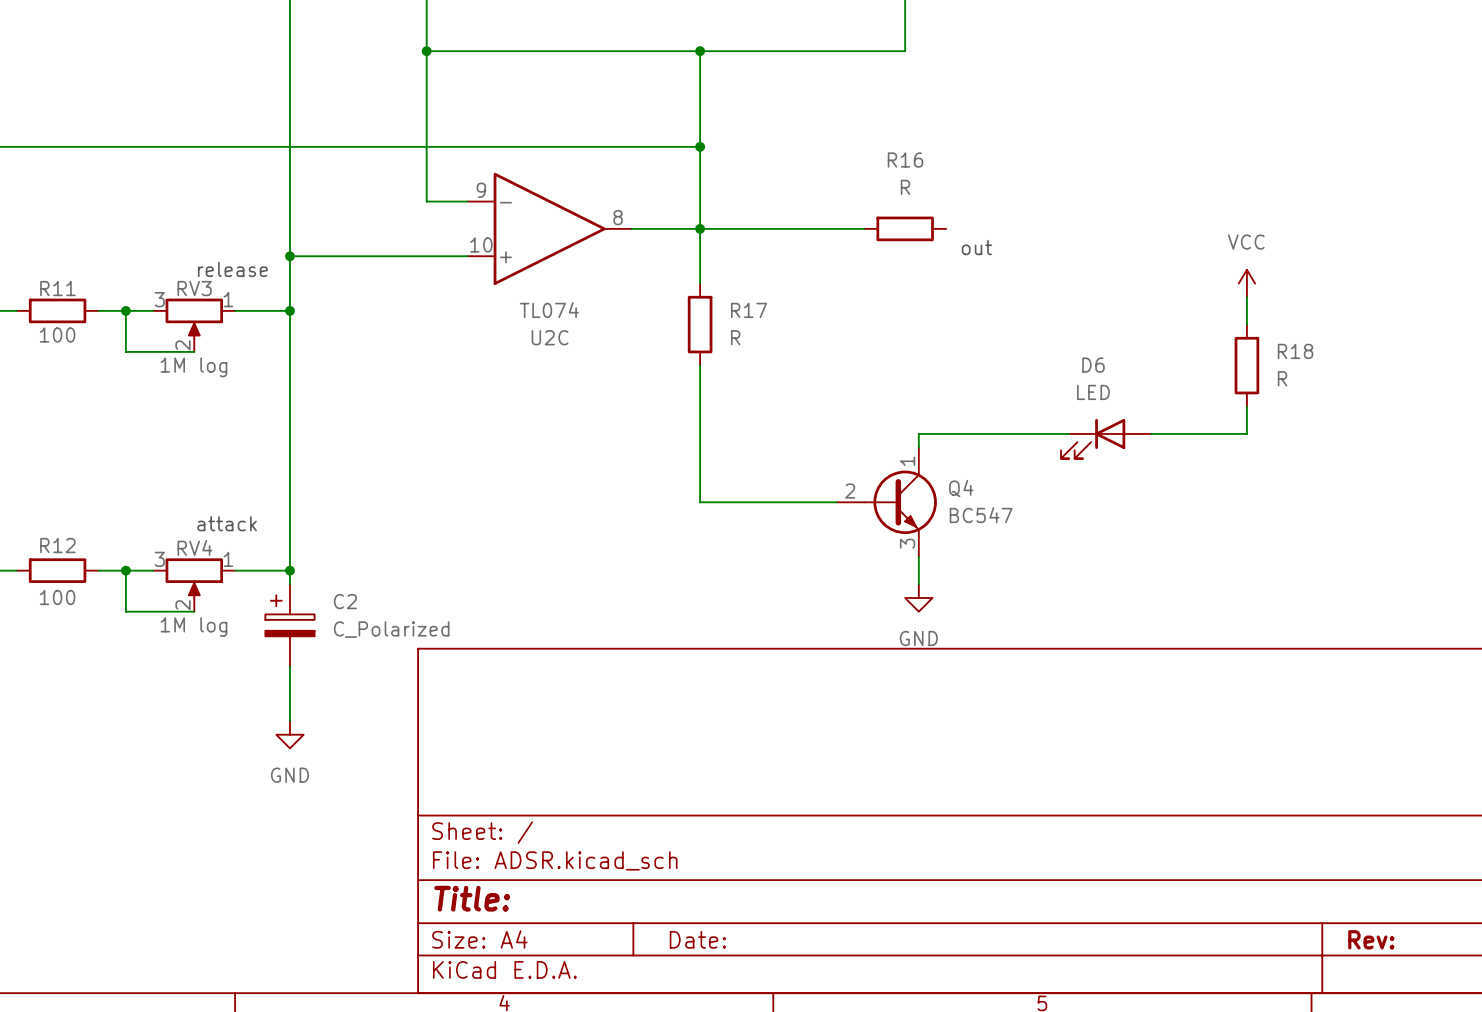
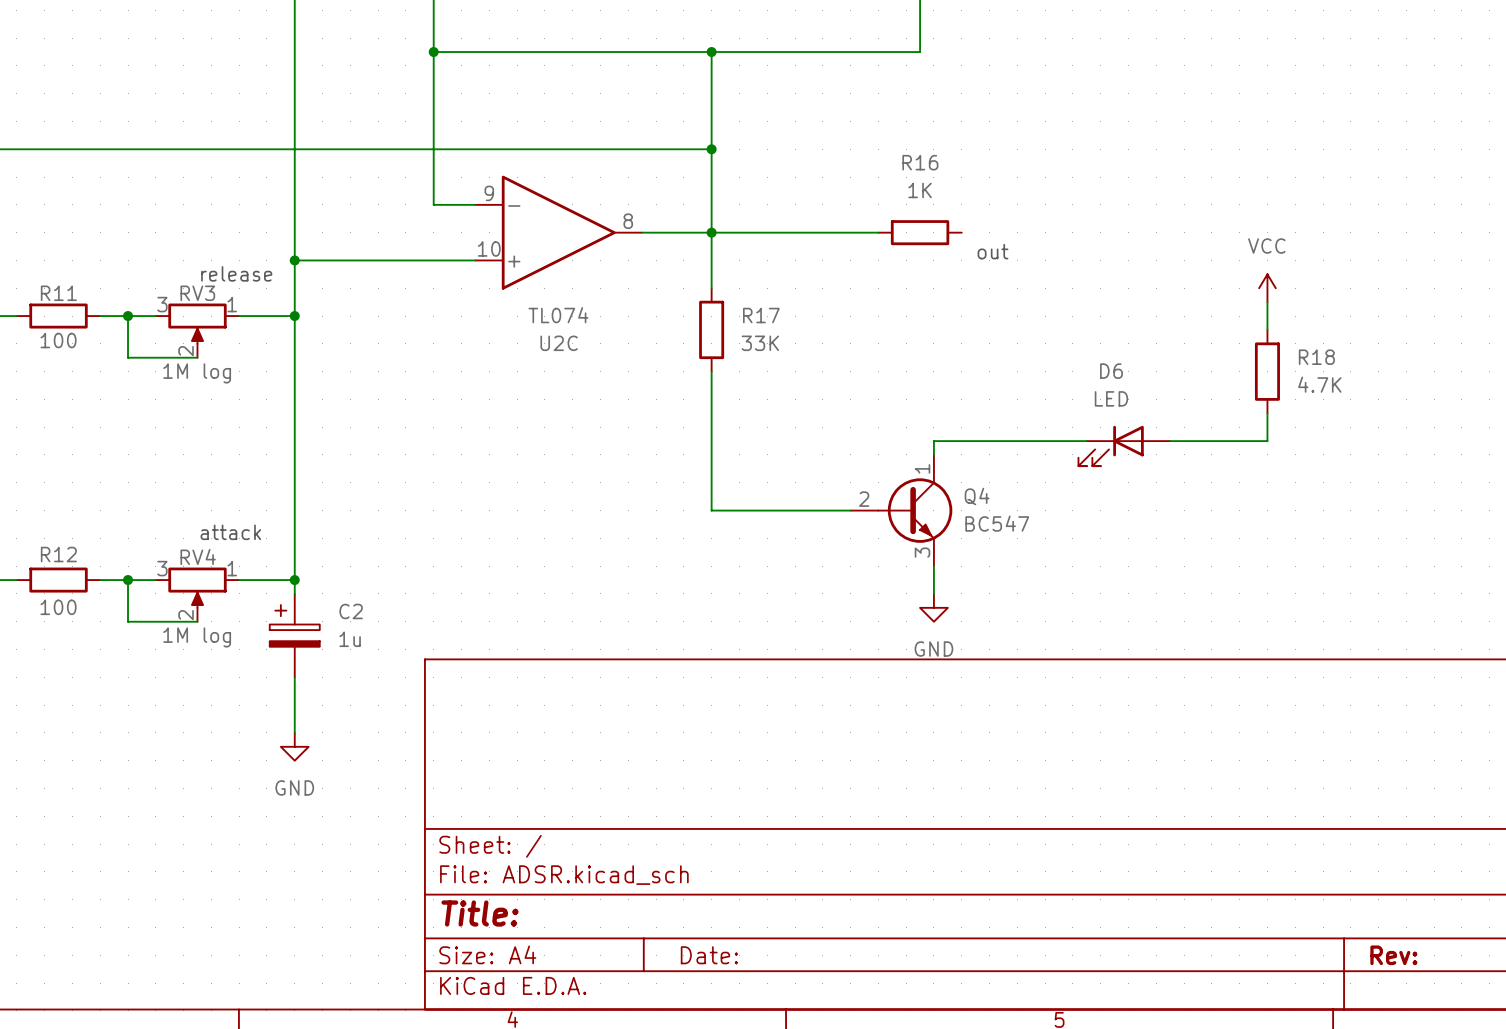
R16 value: R (905, 187) -> 1K (920, 190)
R17 value: R (735, 337) -> 33K (760, 343)
R18 value: R (1282, 378) -> 4.7K (1319, 384)
C2 value: C_Polarized (391, 629) -> 1u (350, 639)

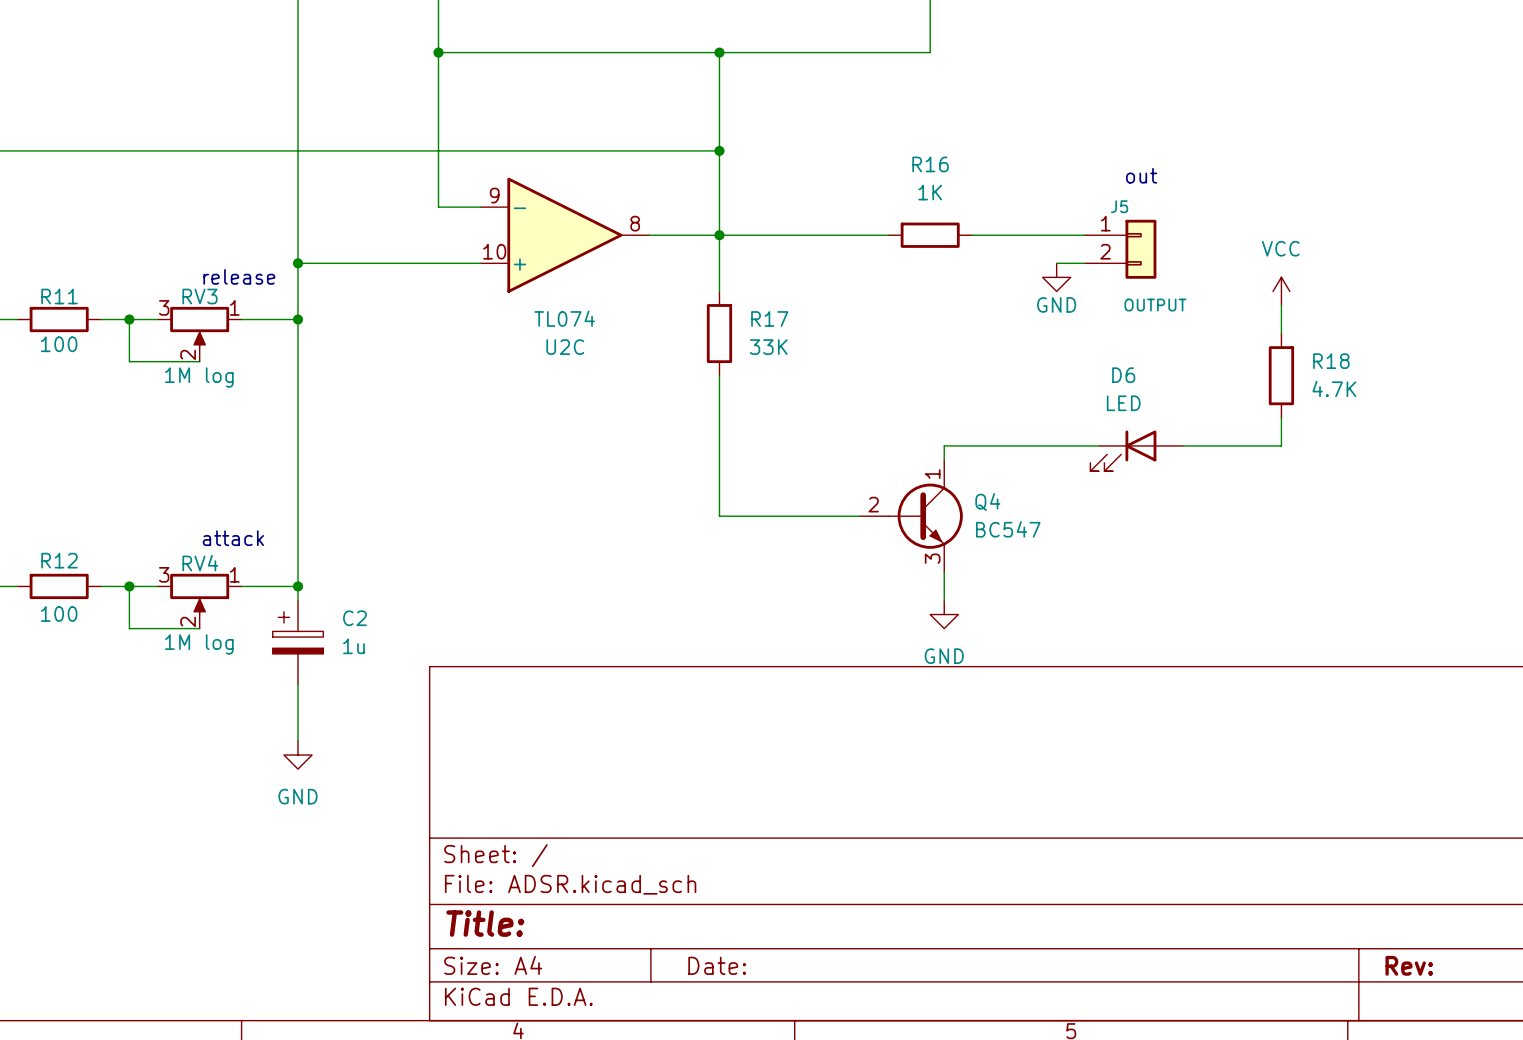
wire: none -> (972, 235) (1084, 235)
J5: none -> OUTPUT (1120, 249)
text position: out (992, 251) -> out (1141, 175)
wire: none -> (1056, 263) (1084, 263)
power symbol: none -> GND (1056, 277)

